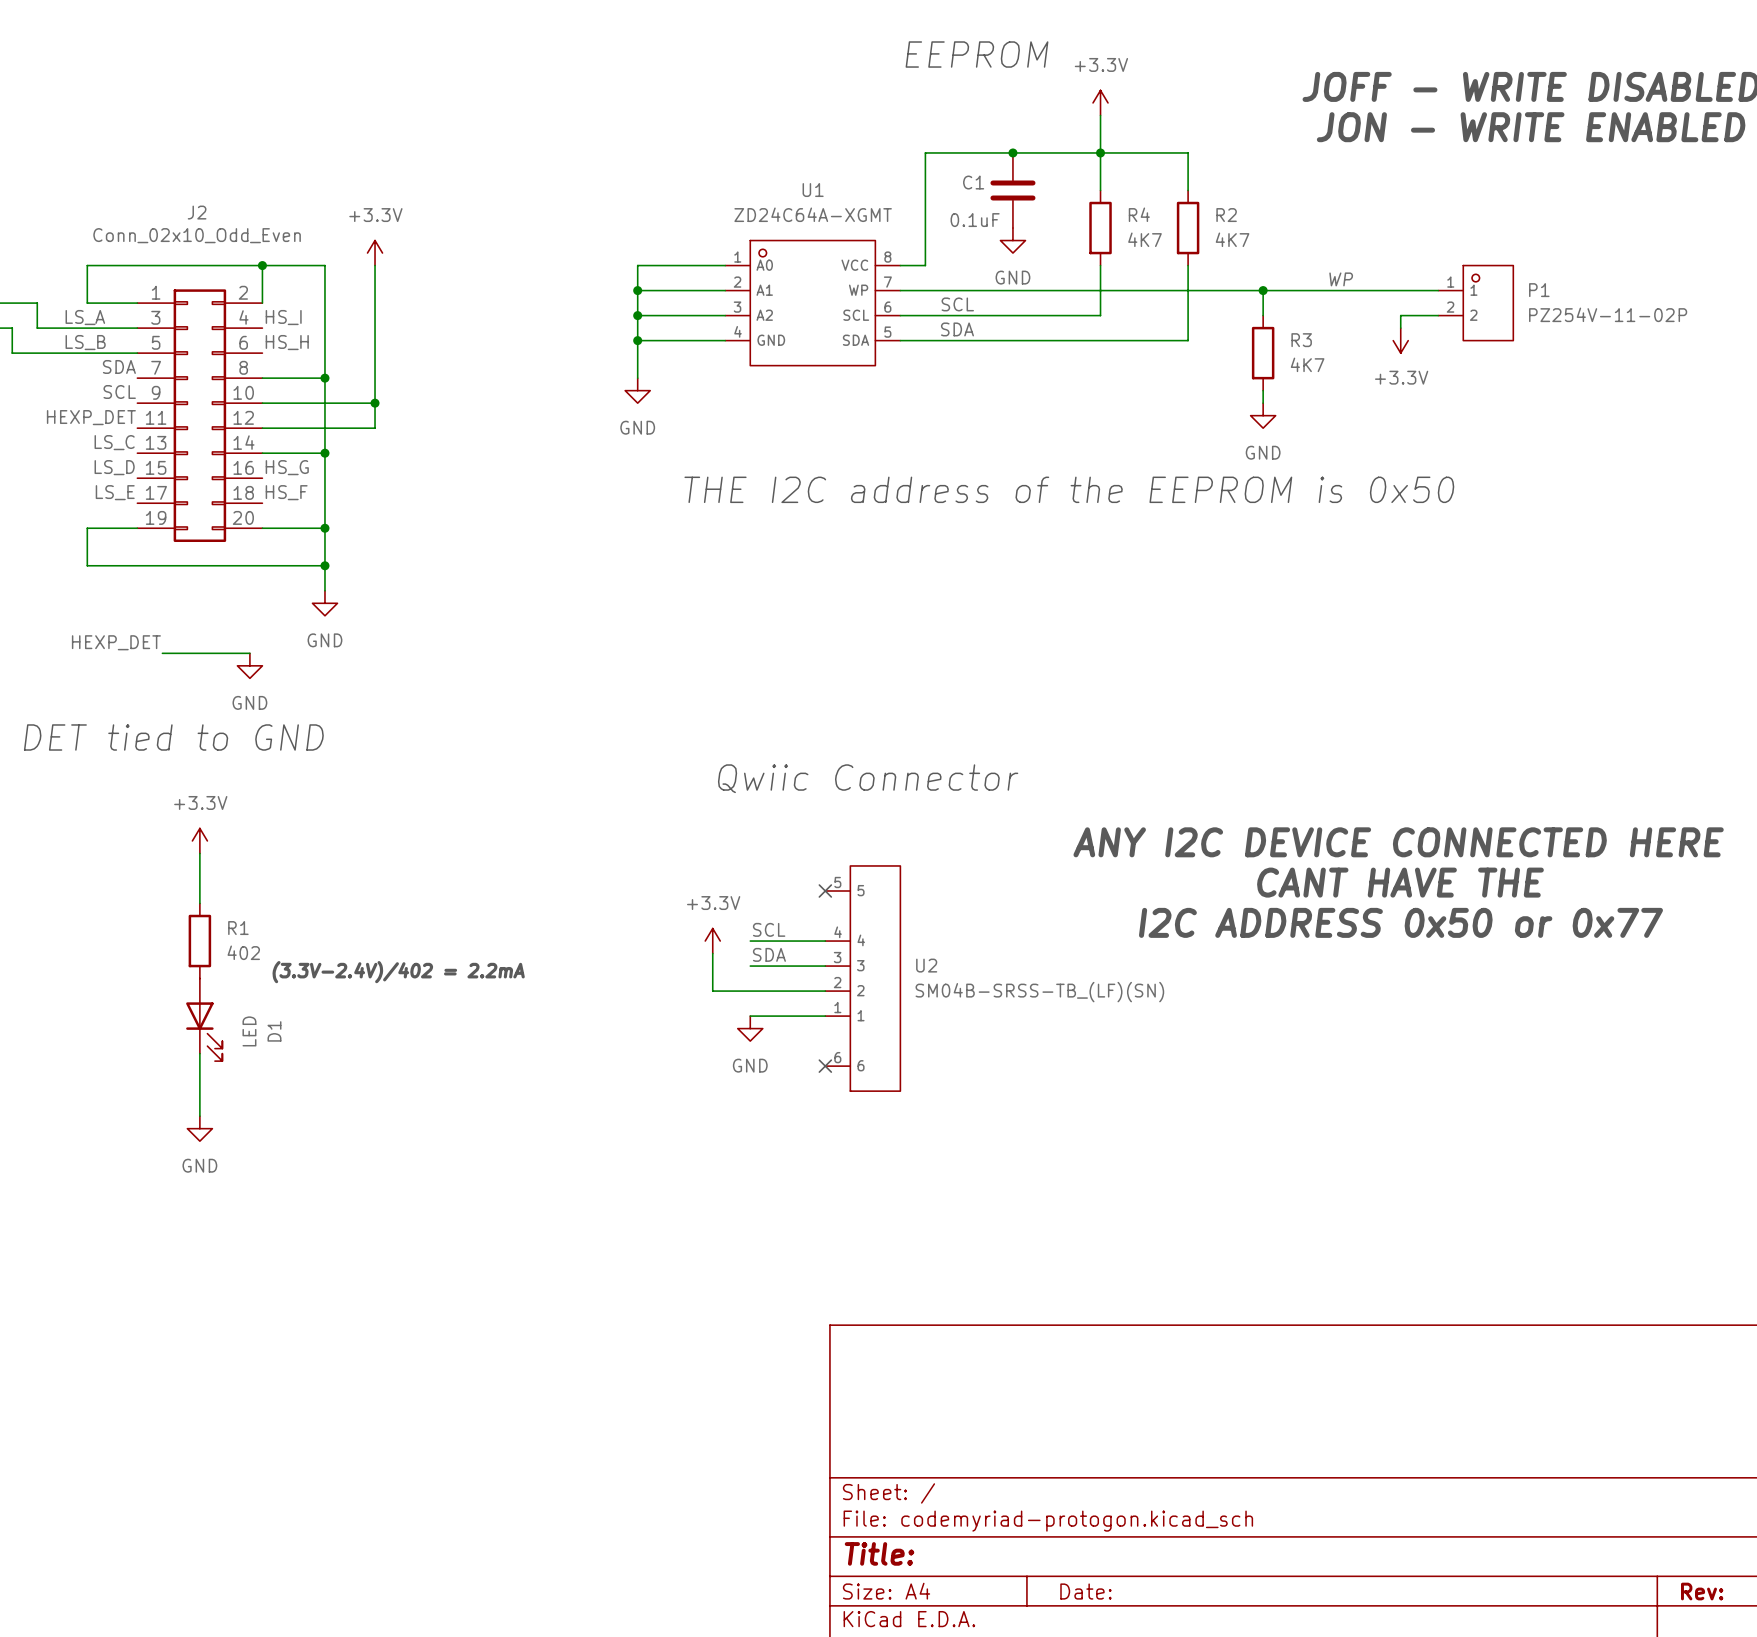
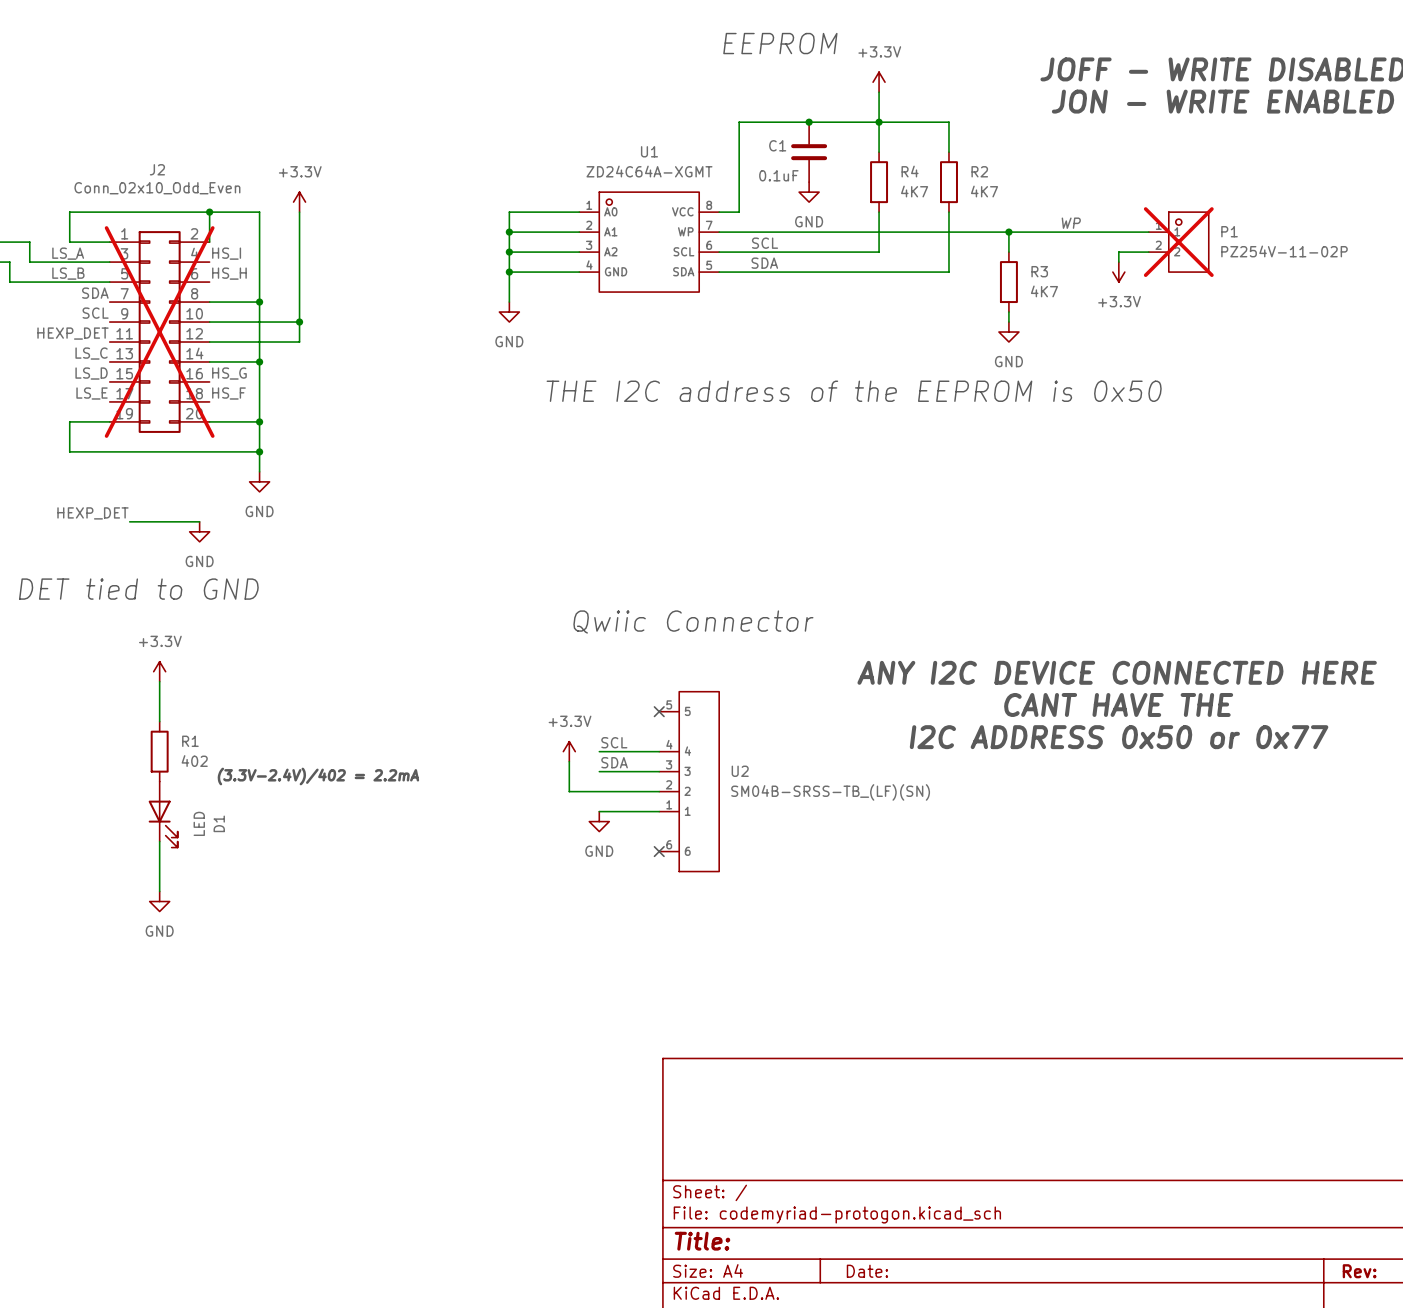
P1 do-not-place cross: none -> (1178, 242)
J2 do-not-place cross: none -> (159, 332)

